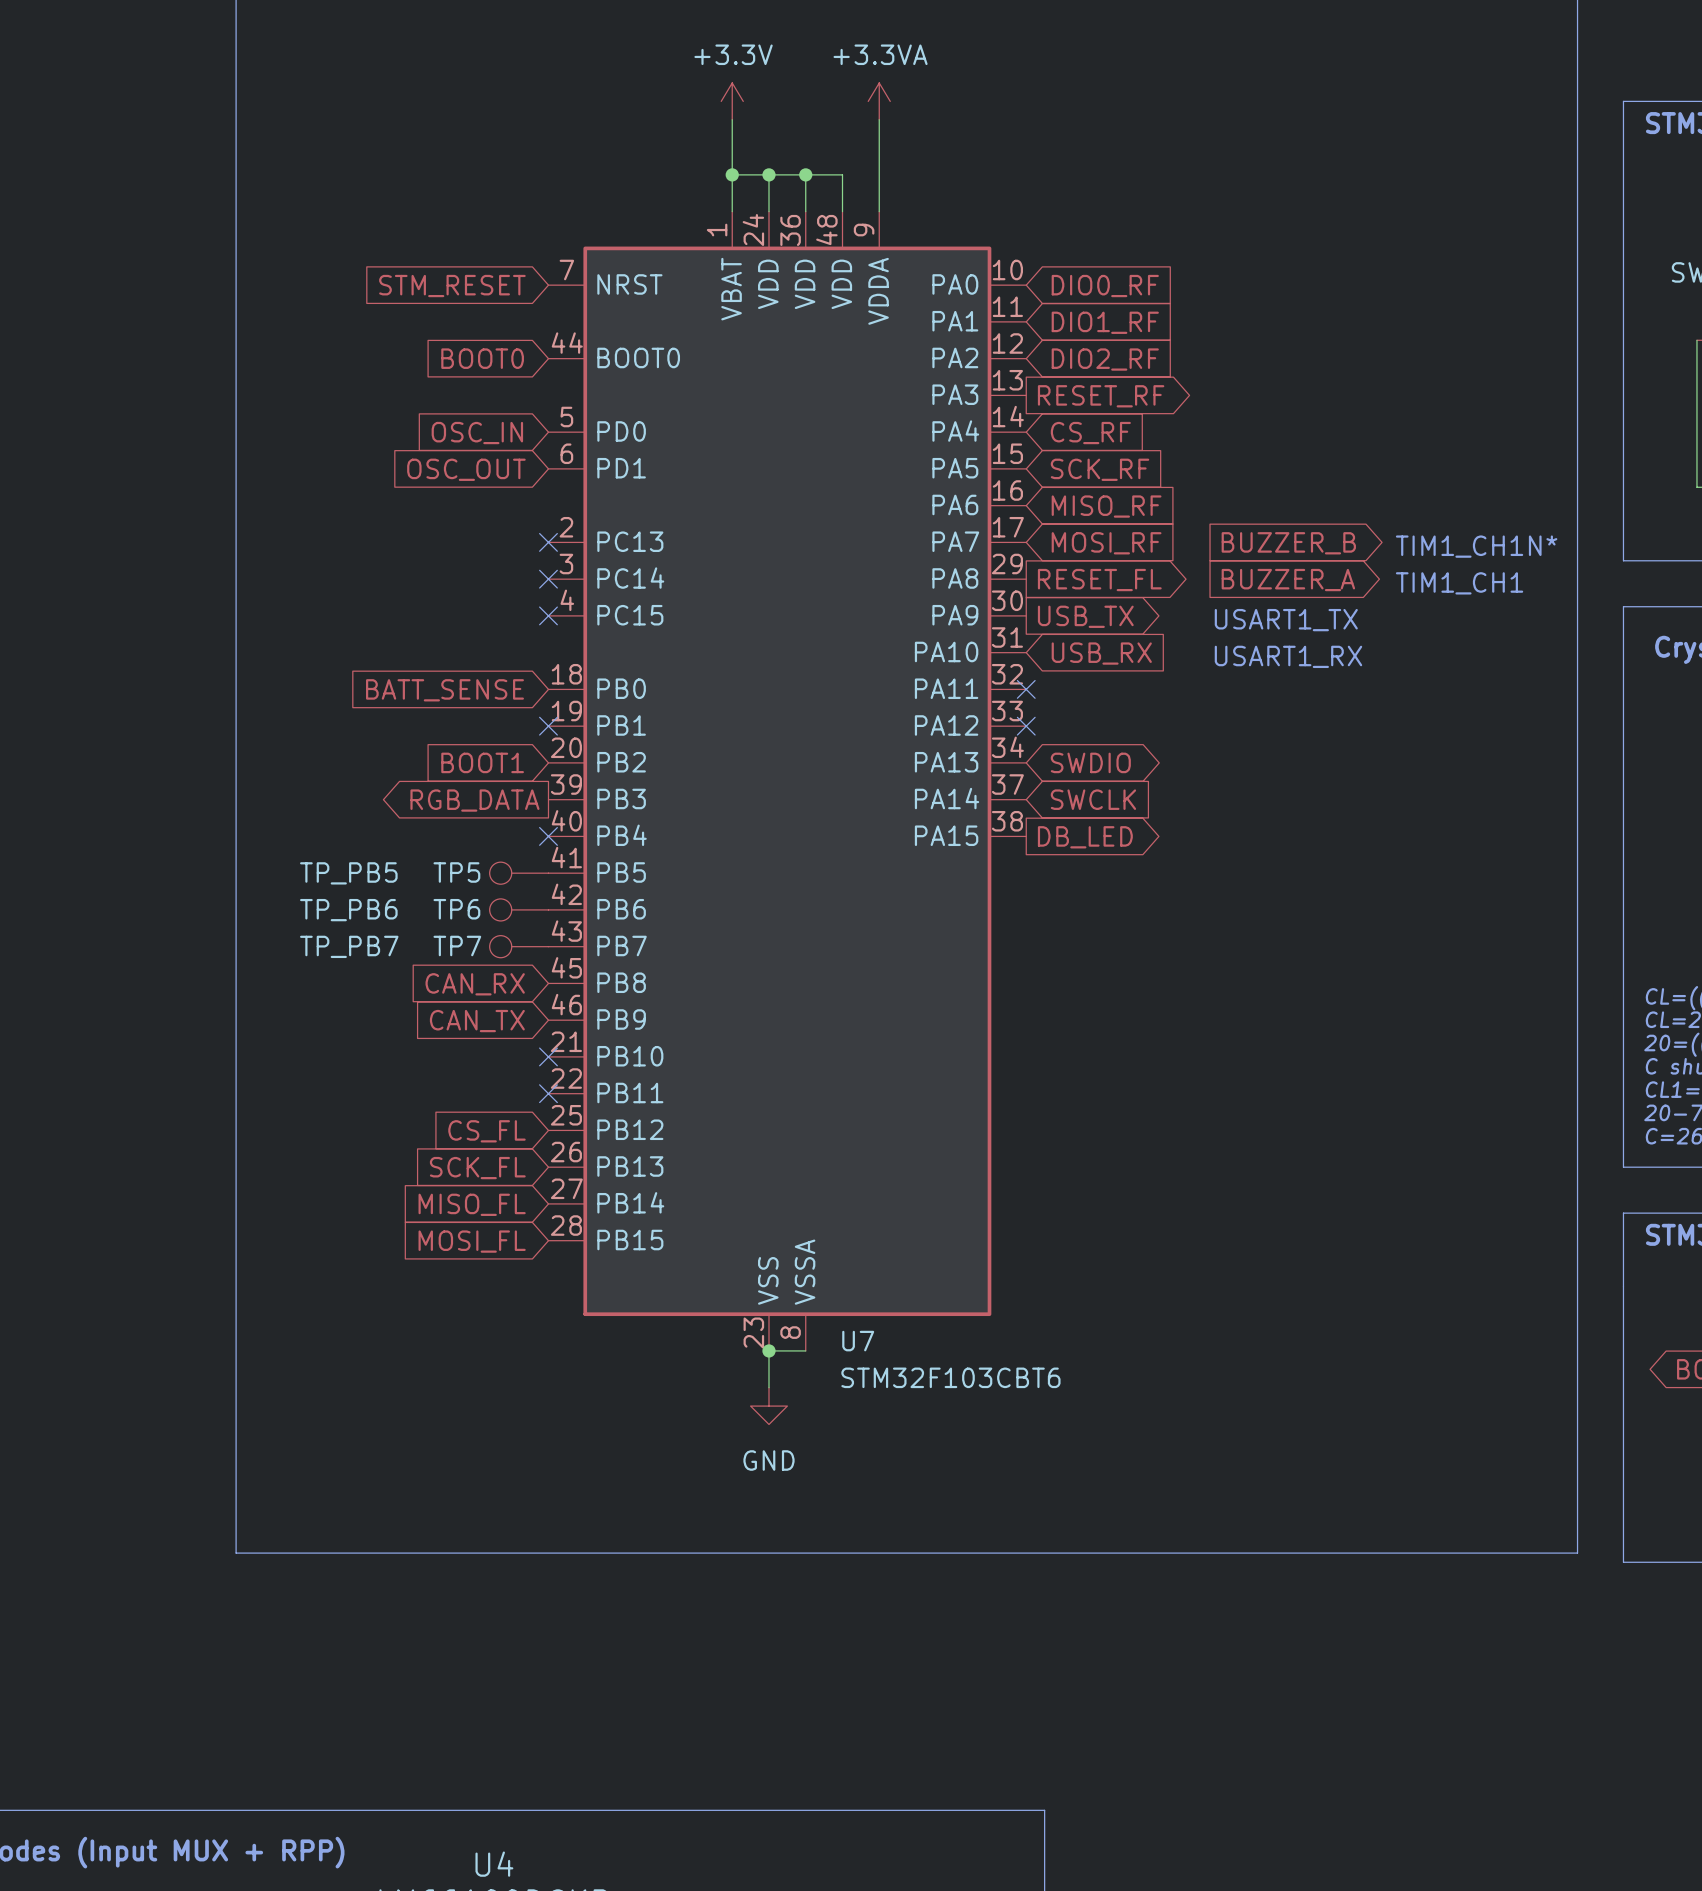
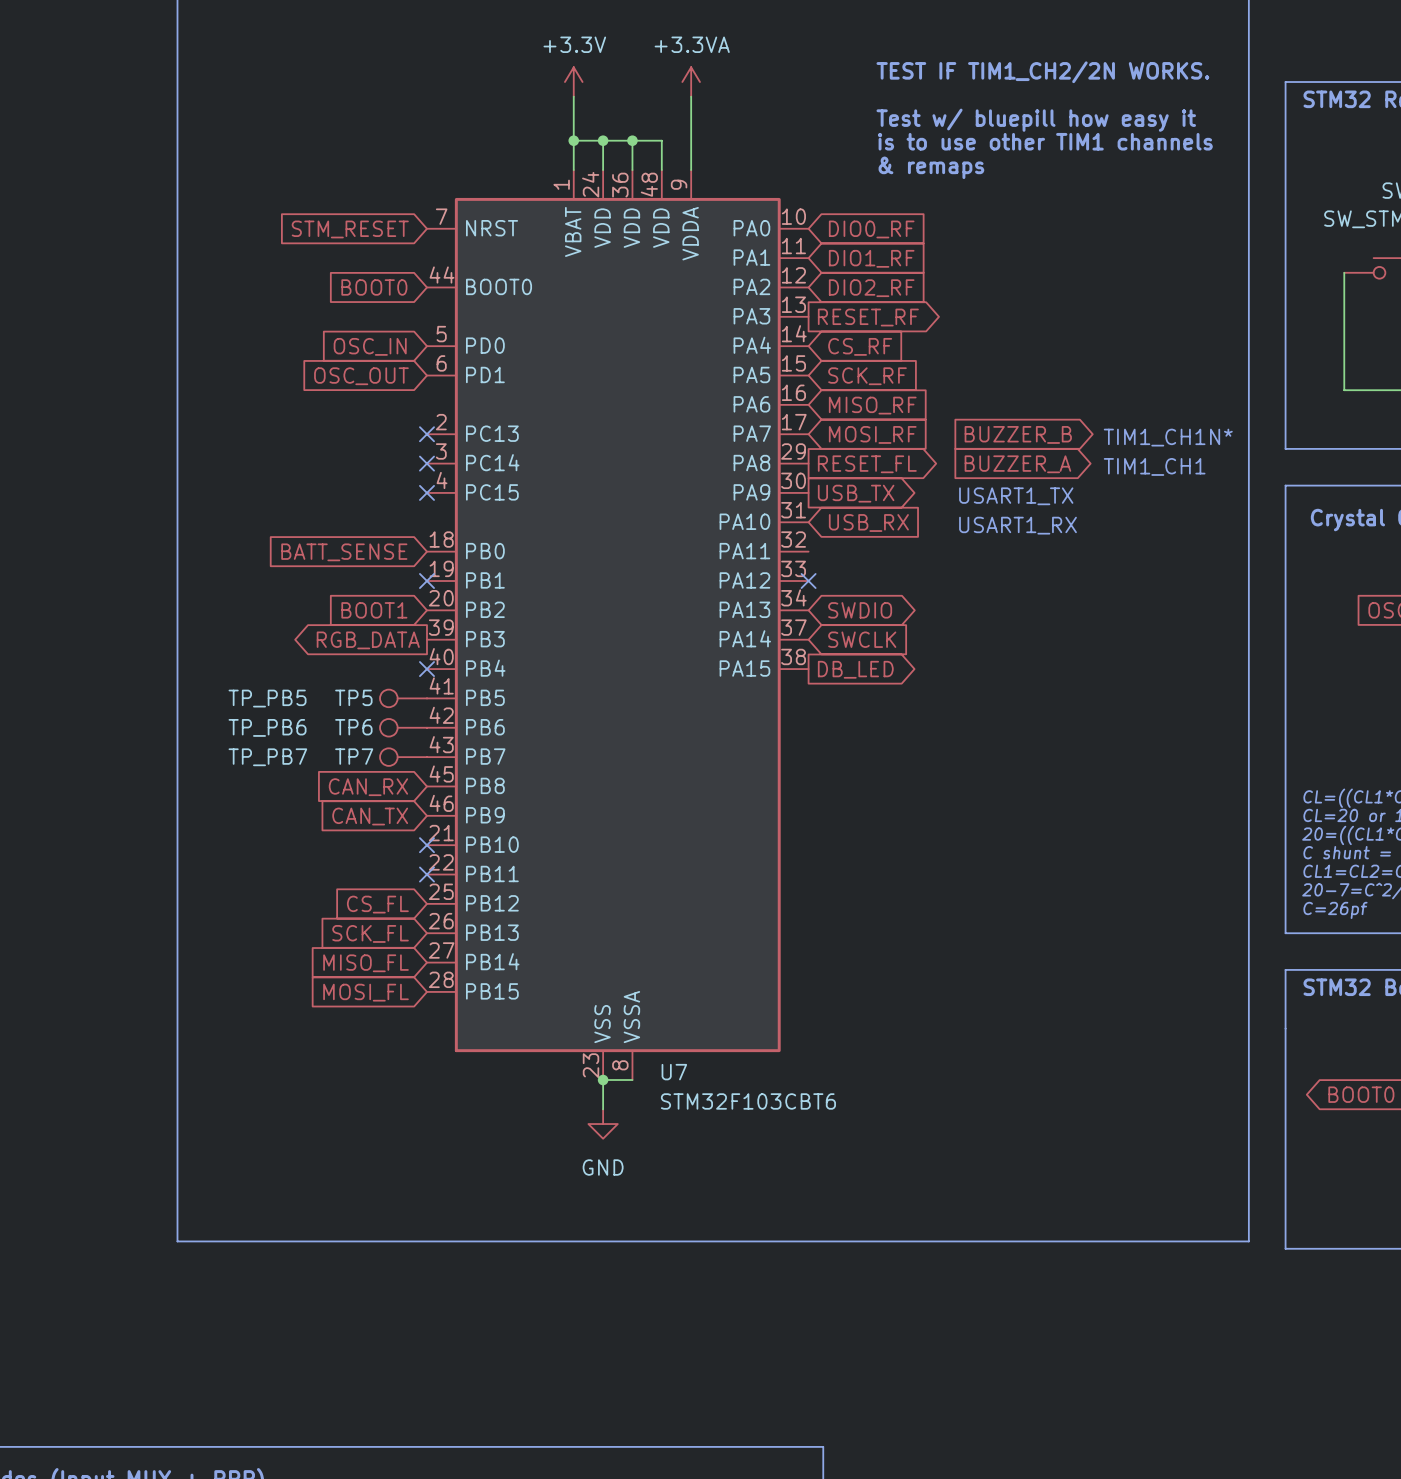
text: none -> TEST IF TIM1_CH2/2N WORKS. (1042, 72)
text: none -> Test w/ bluepill how easy it (1036, 120)
text: none -> is to use other TIM1 channels (1045, 141)
text: none -> & remaps (931, 167)
no-connect mark: (1026, 689) -> none

